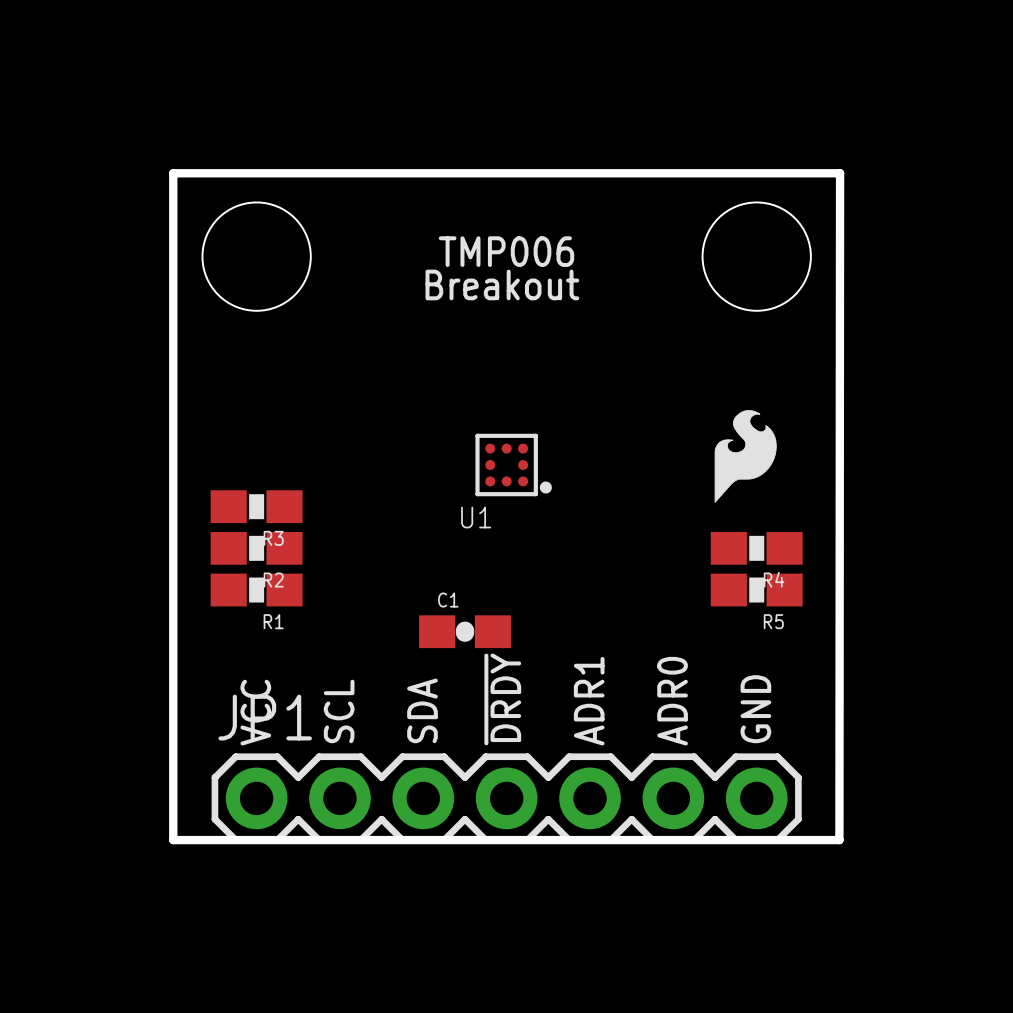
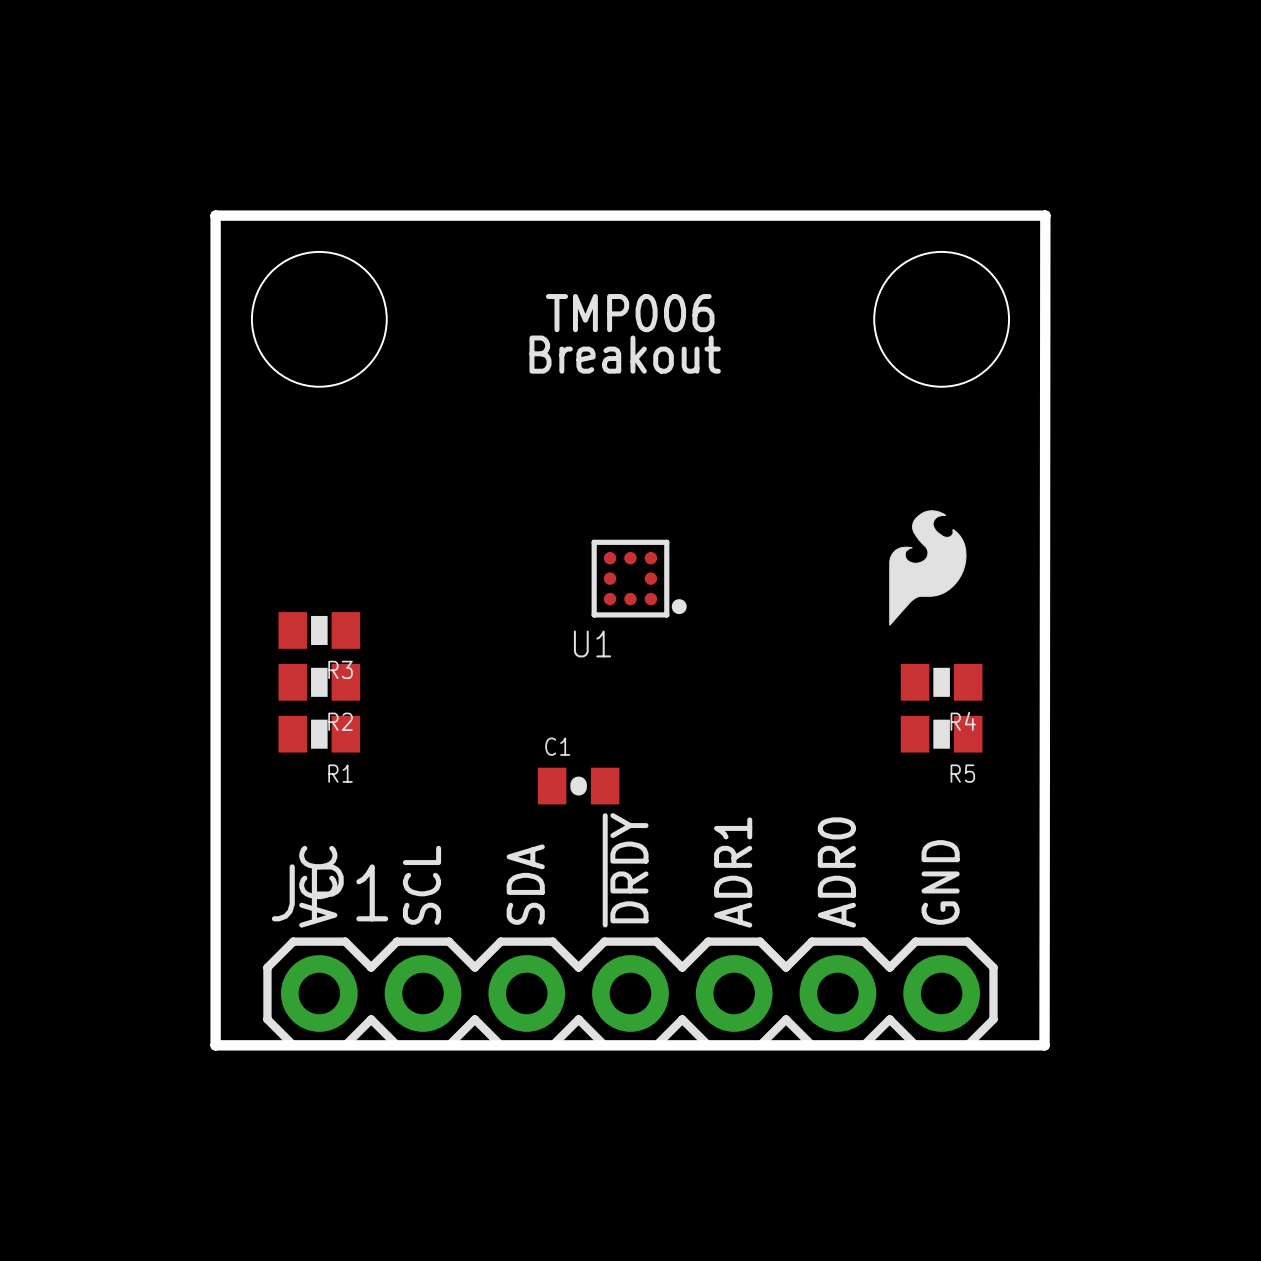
R3 footprint: [210, 490, 303, 524] -> [278, 612, 361, 649]
R2 footprint: [210, 531, 303, 565] -> [278, 663, 361, 701]
R4 footprint: [710, 531, 803, 565] -> [900, 663, 983, 701]
R1 footprint: [210, 573, 303, 607] -> [278, 715, 361, 753]
R5 footprint: [710, 573, 803, 607] -> [900, 715, 983, 753]
C1 footprint: [419, 615, 511, 649] -> [537, 767, 620, 805]

